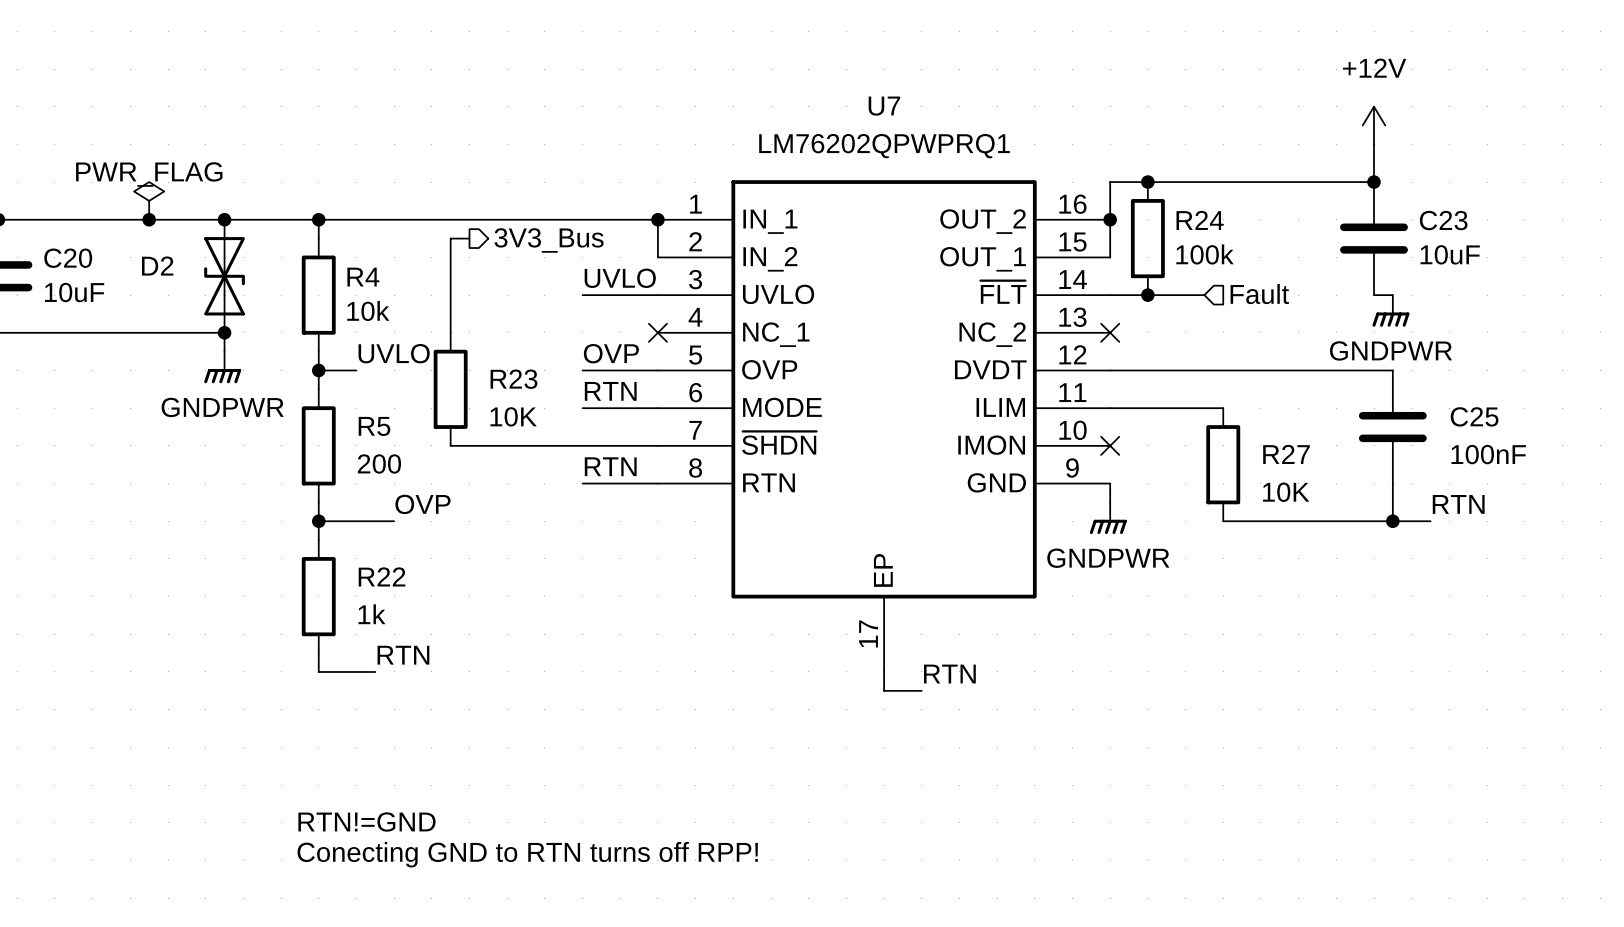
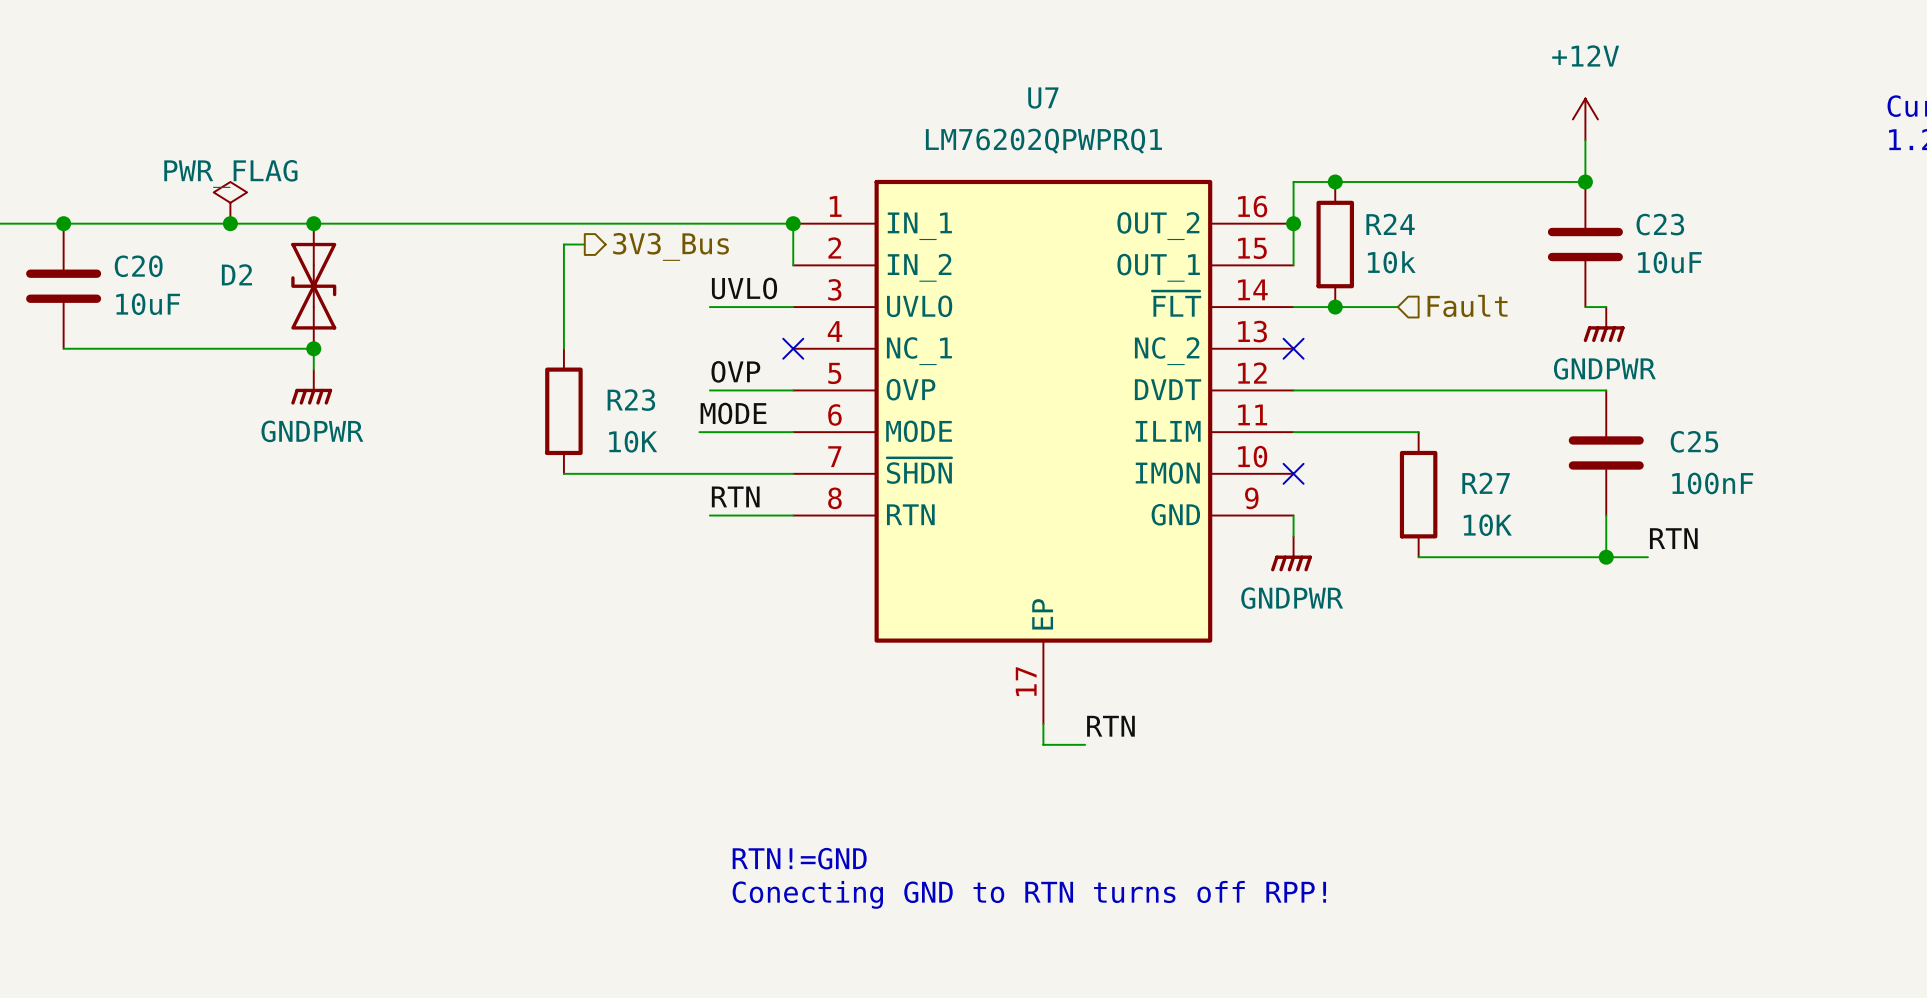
wire: (318, 219) (318, 238) -> none
junction: (318, 219) -> none
R24 value: 100k (1205, 254) -> 10k (1391, 262)
R4: 10k (318, 295) -> none
wire: (318, 351) (318, 389) -> none
label: UVLO (394, 353) -> none
wire: (318, 370) (356, 370) -> none
junction: (318, 370) -> none
label: RTN (610, 391) -> MODE (733, 413)
wire: none -> (699, 432) (709, 432)
R5: 200 (318, 445) -> none
wire: (318, 502) (318, 540) -> none
label: OVP (422, 504) -> none
wire: (318, 521) (394, 521) -> none
junction: (318, 521) -> none
R22: 1k (318, 596) -> none
wire: (318, 653) (318, 671) (375, 671) -> none
label: RTN (403, 655) -> none
text position: RTN!=GND (366, 822) -> RTN!=GND (799, 858)
text position: Conecting GND to RTN turns off RPP! (527, 854) -> Conecting GND to RTN turns off RPP! (1029, 894)

